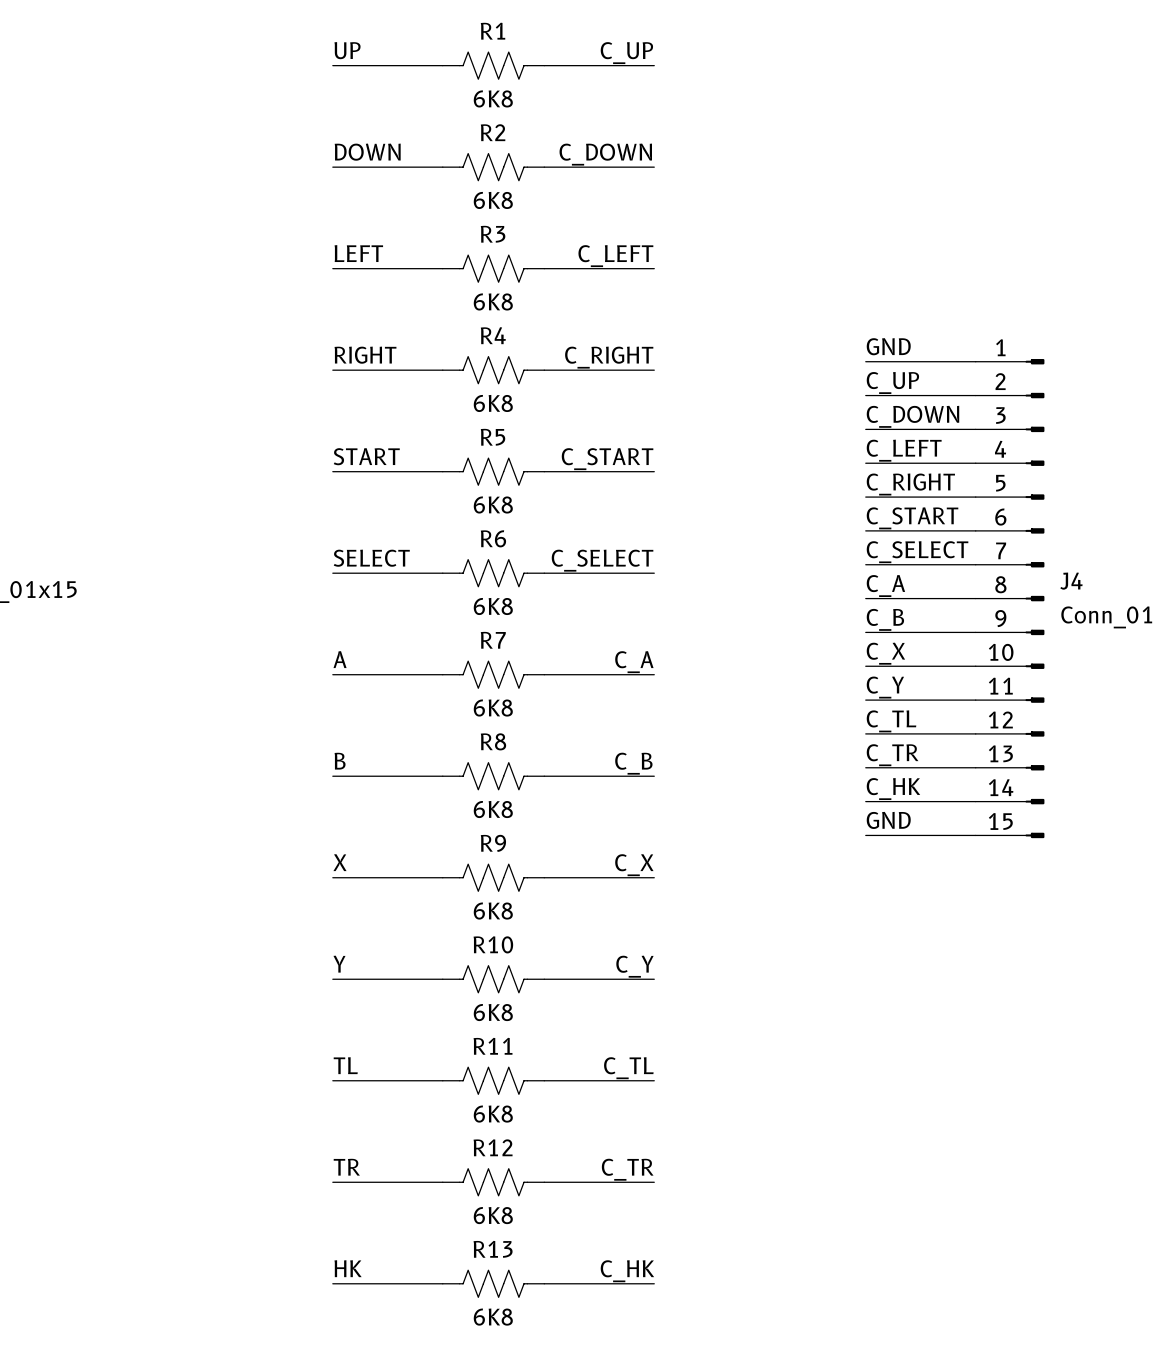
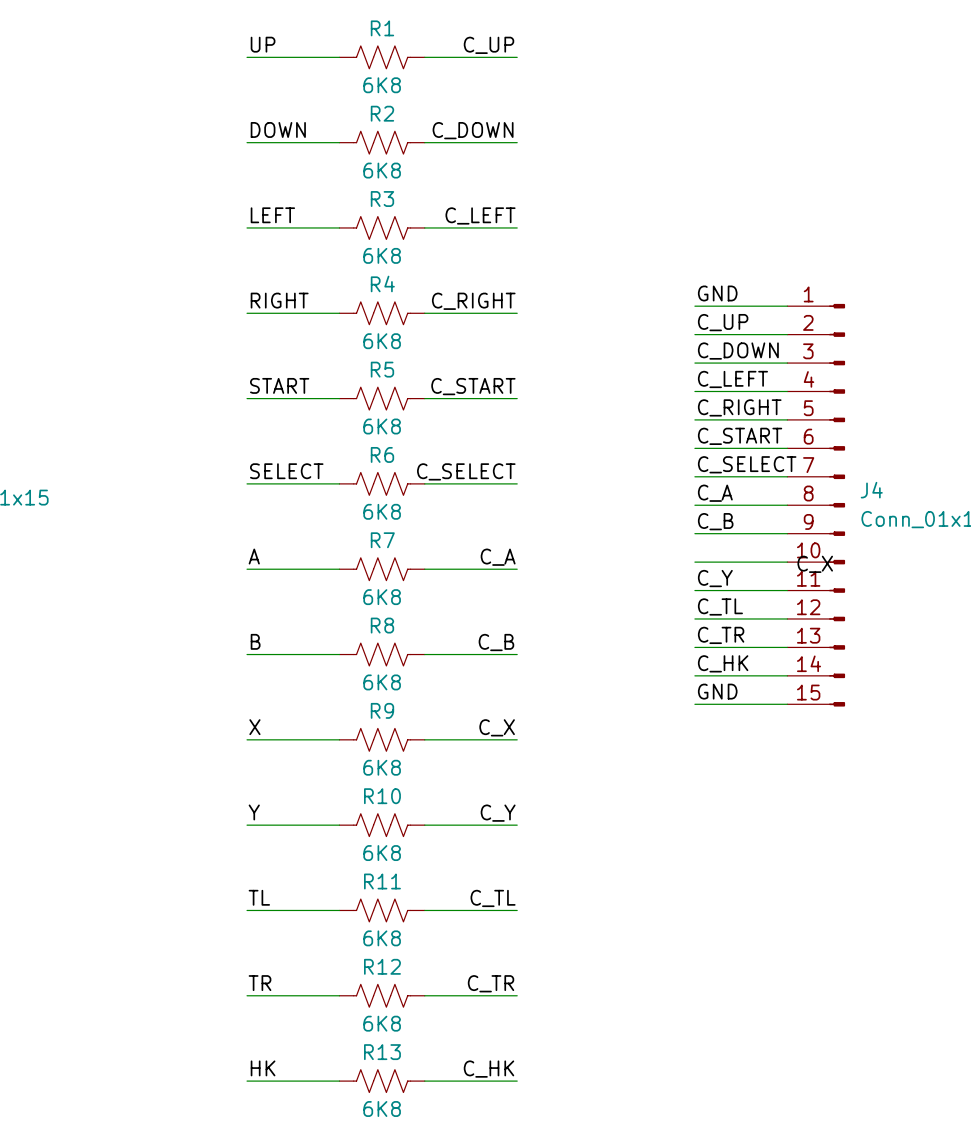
label position: C_X (885, 653) -> C_X (815, 564)

